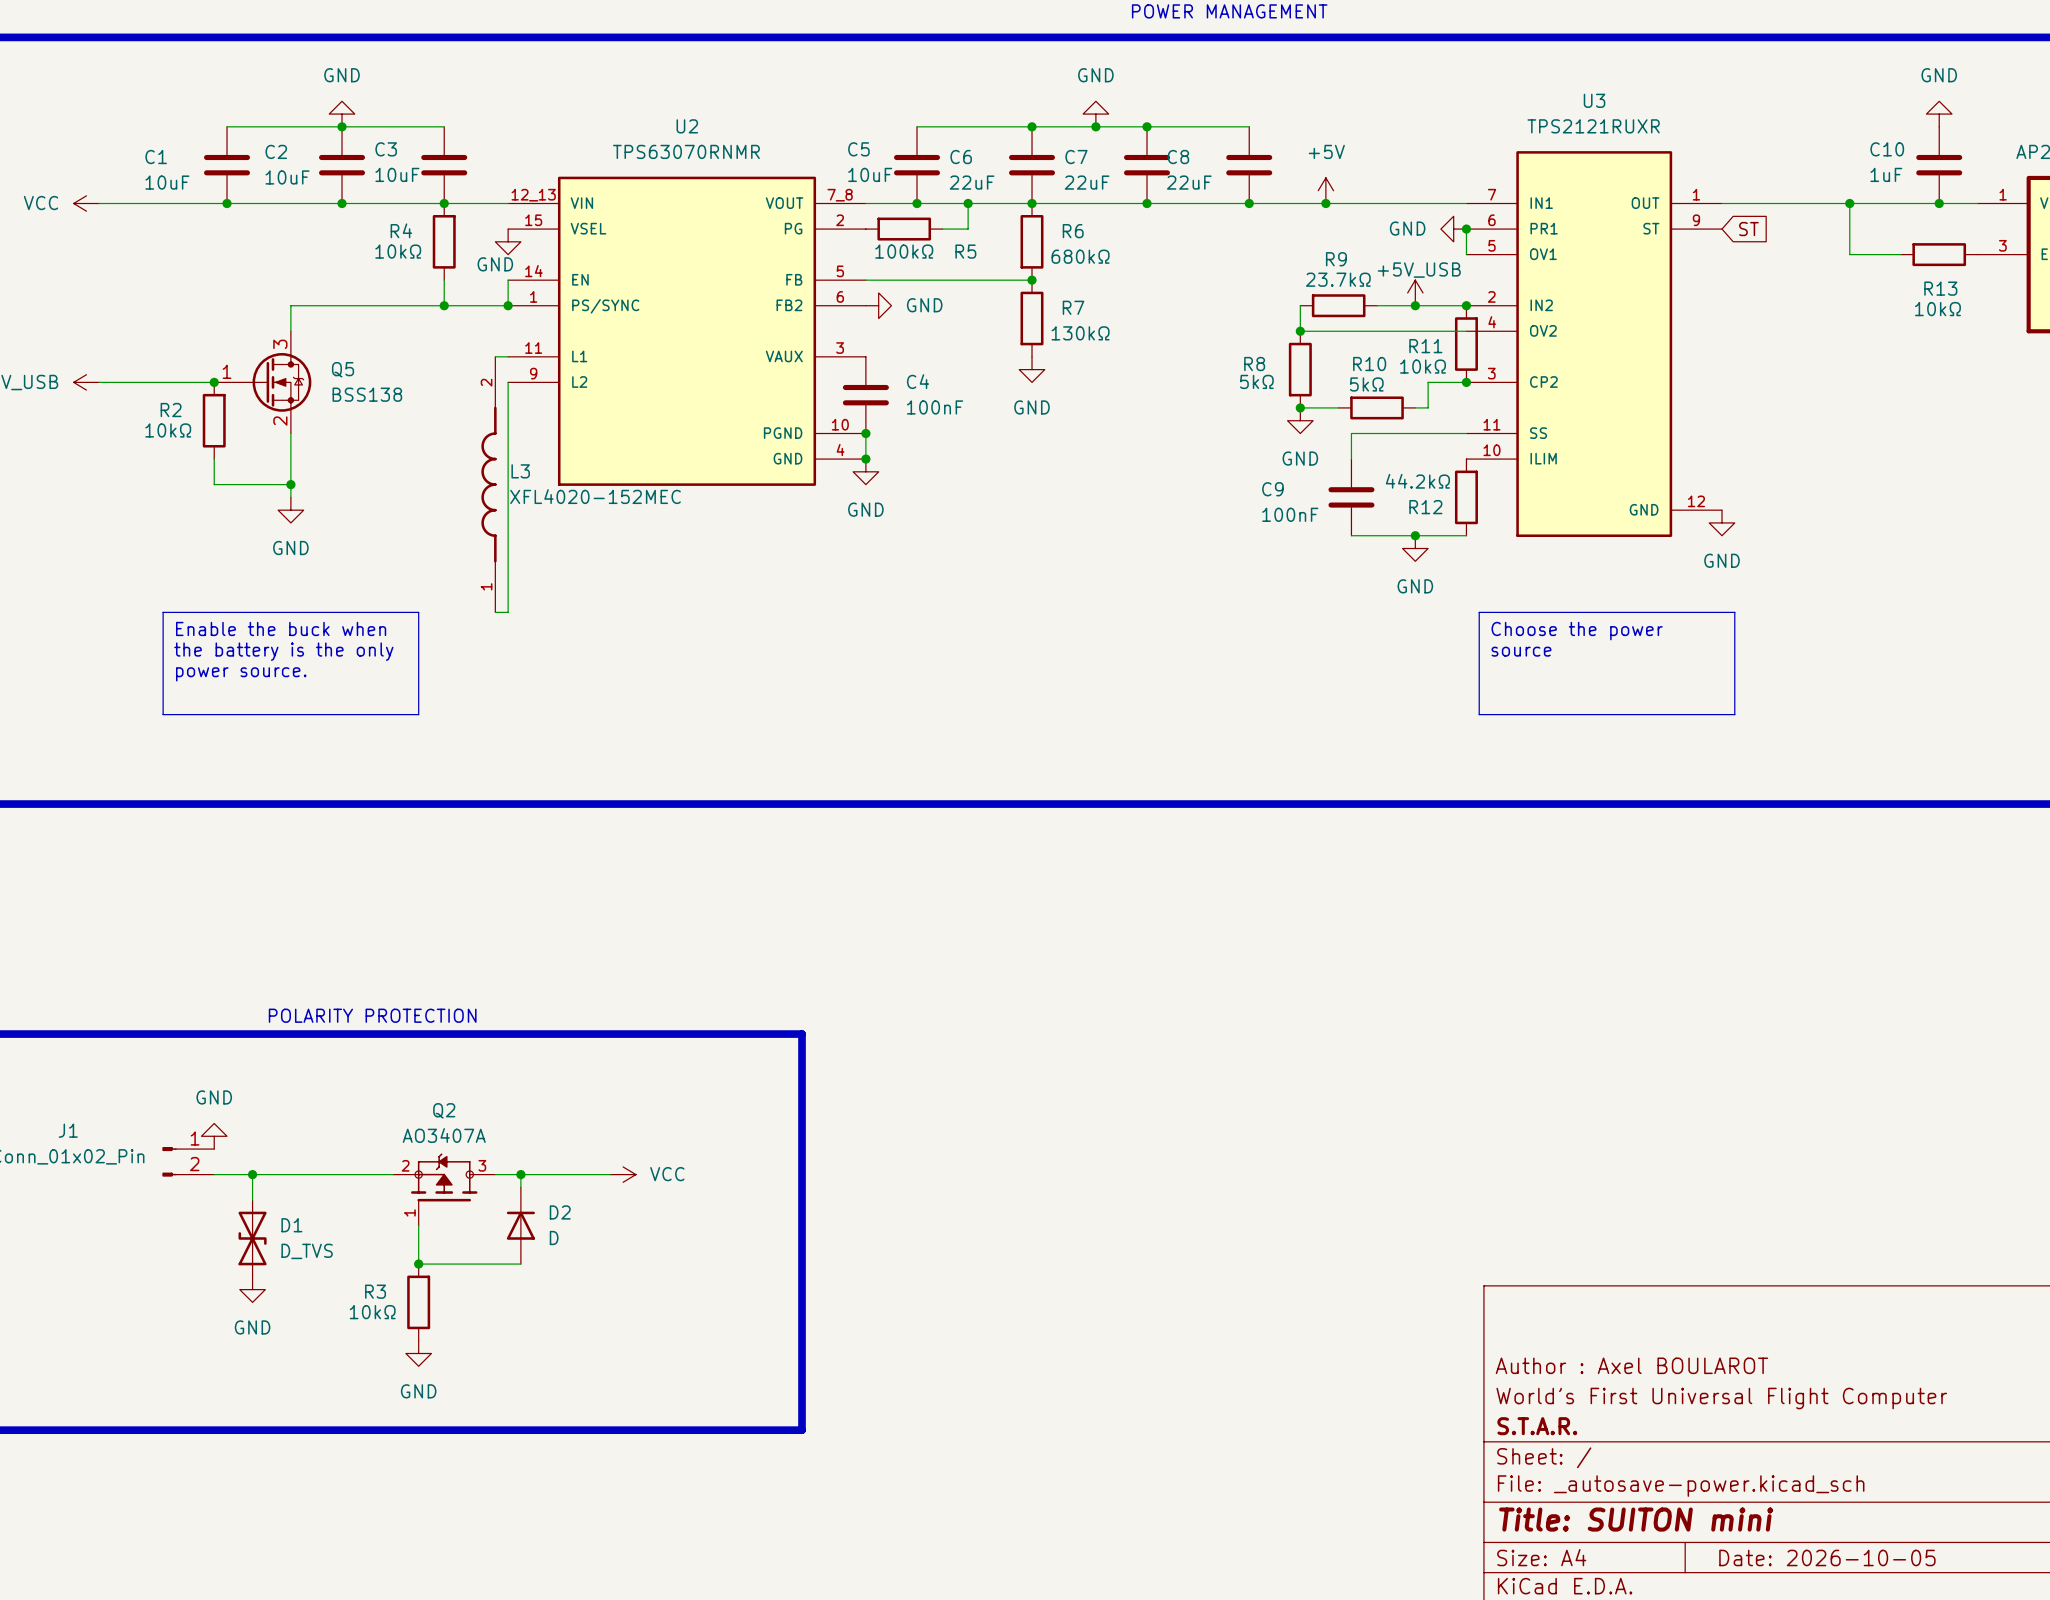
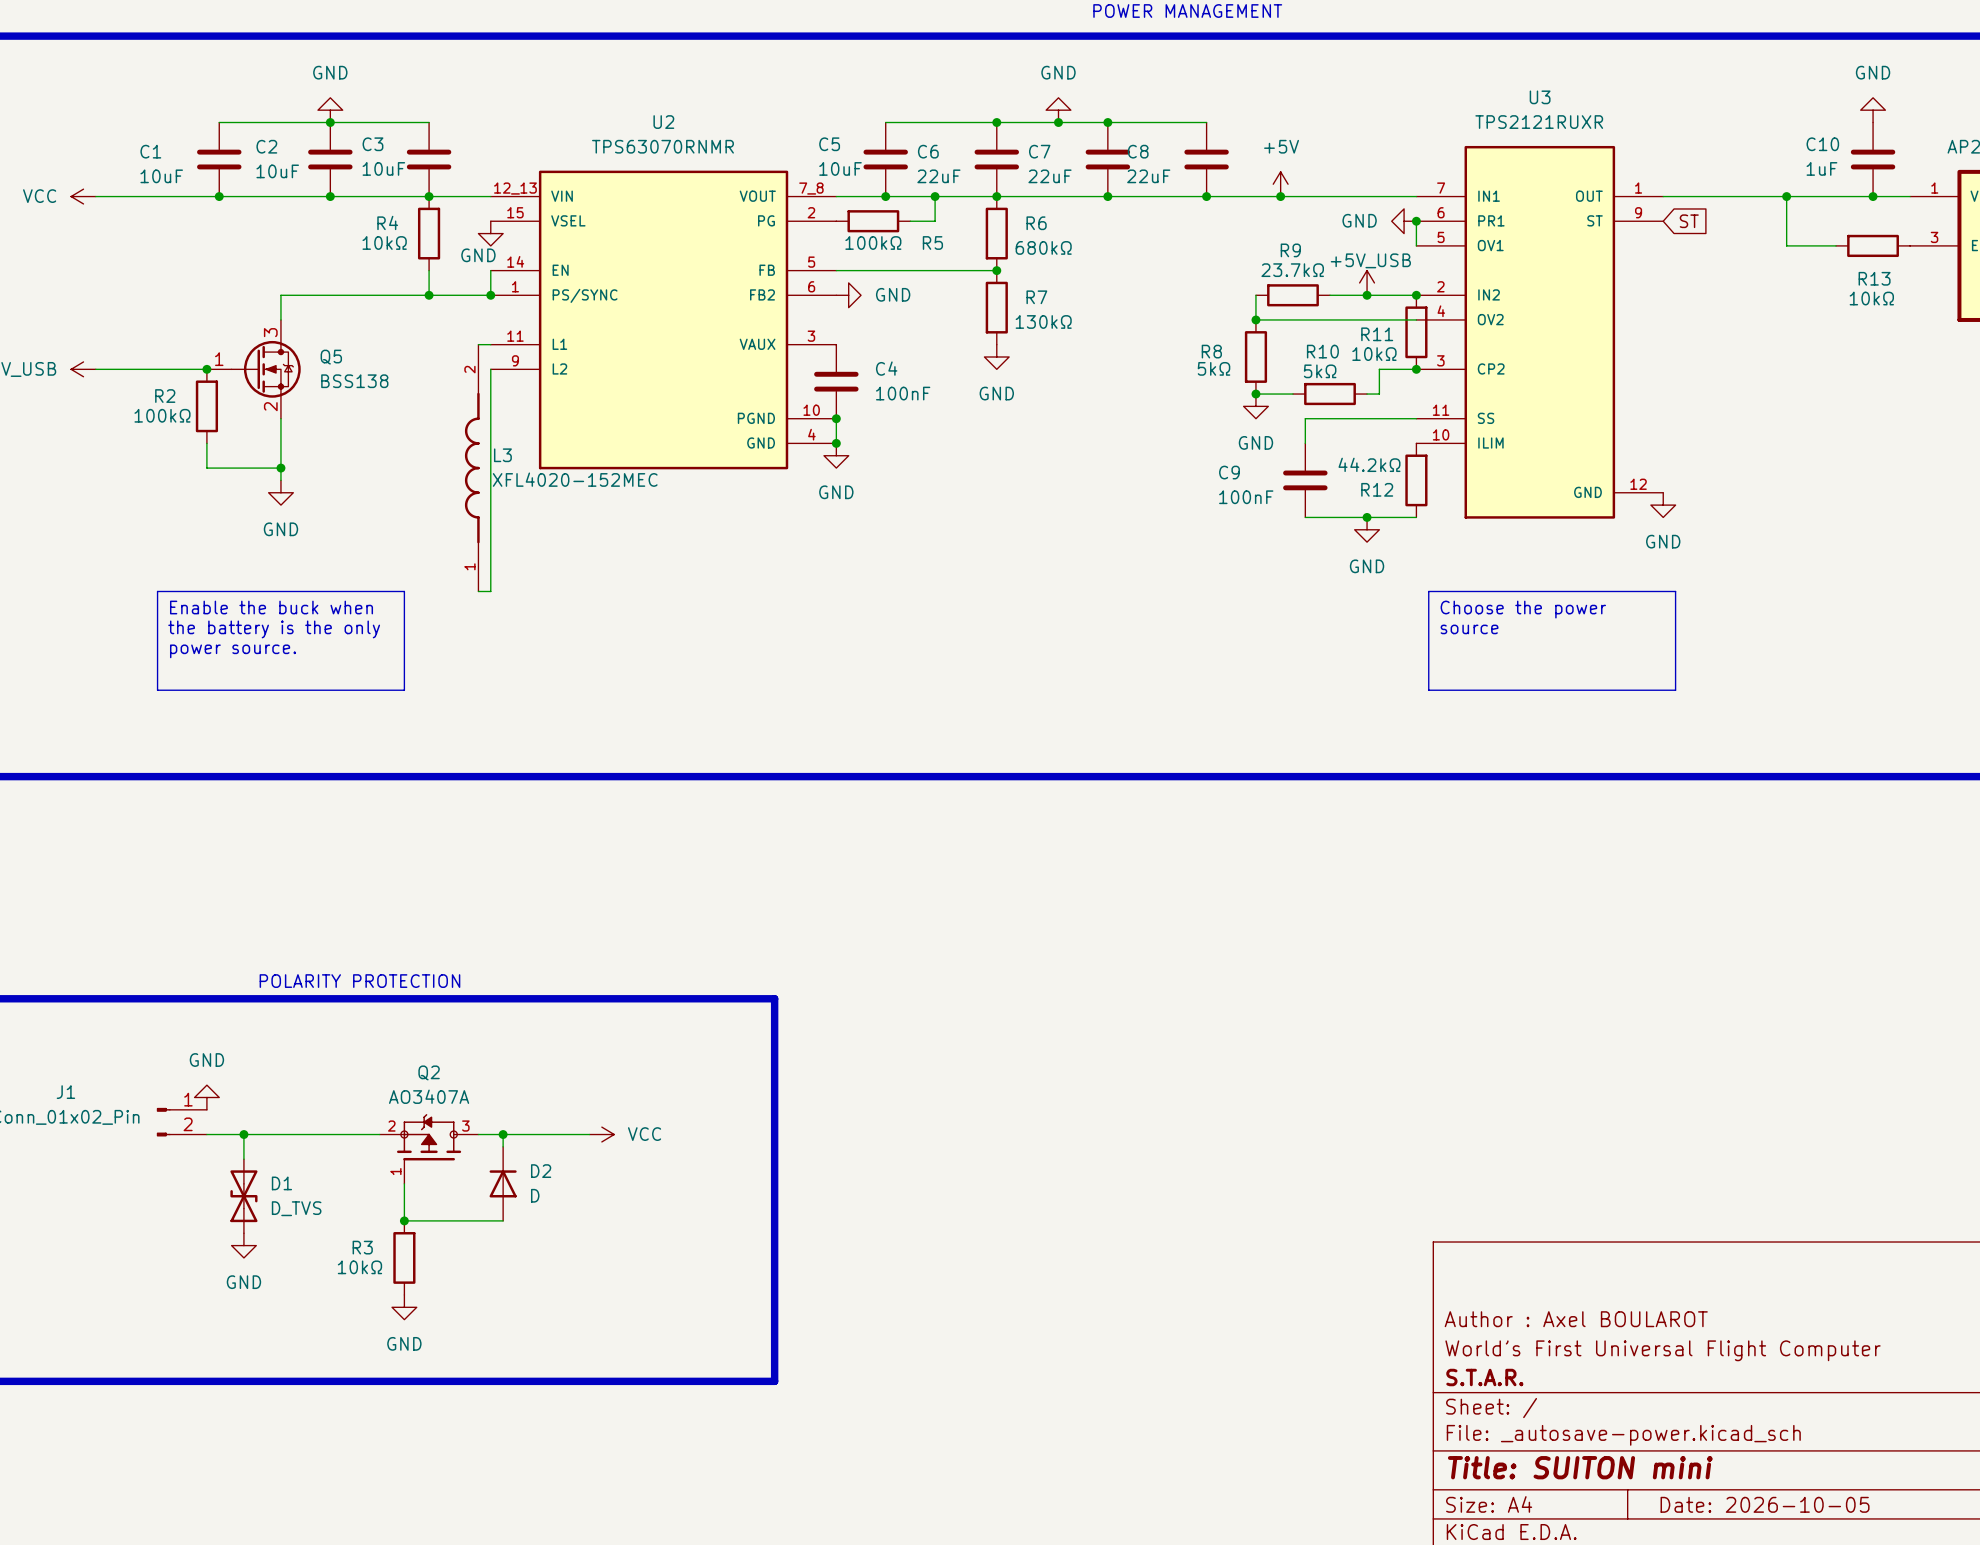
R2 value: 10kΩ (168, 430) -> 100kΩ (162, 415)

